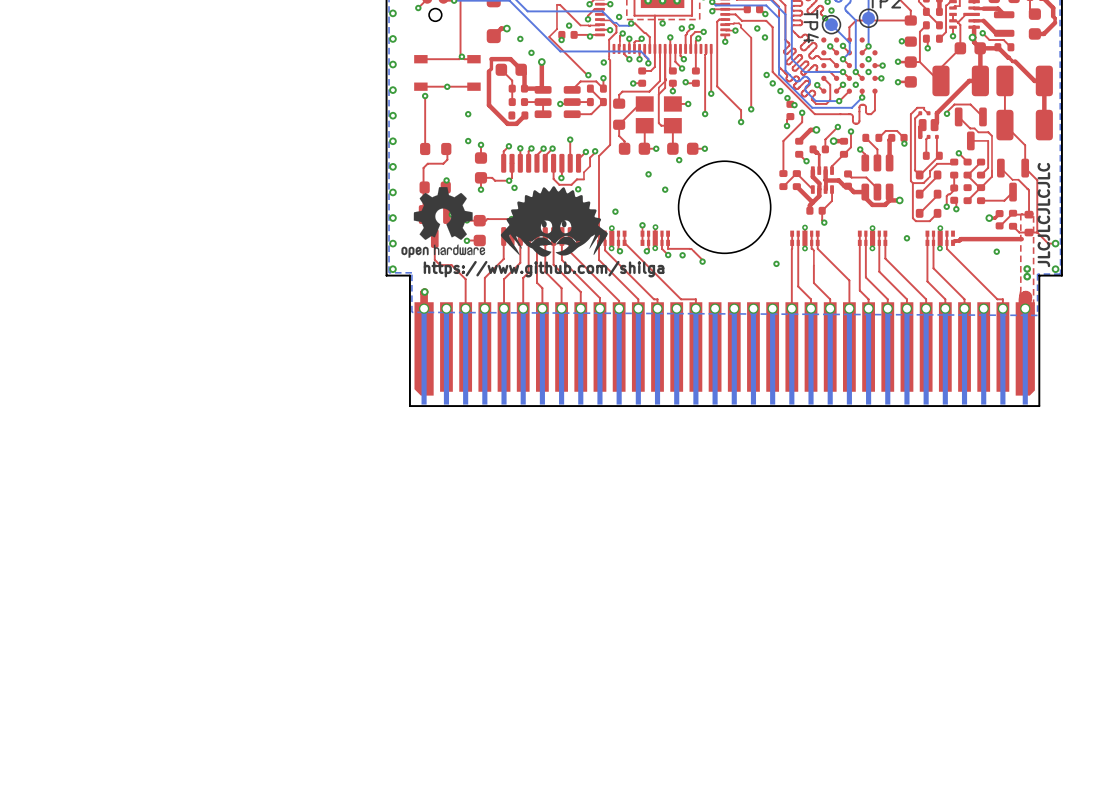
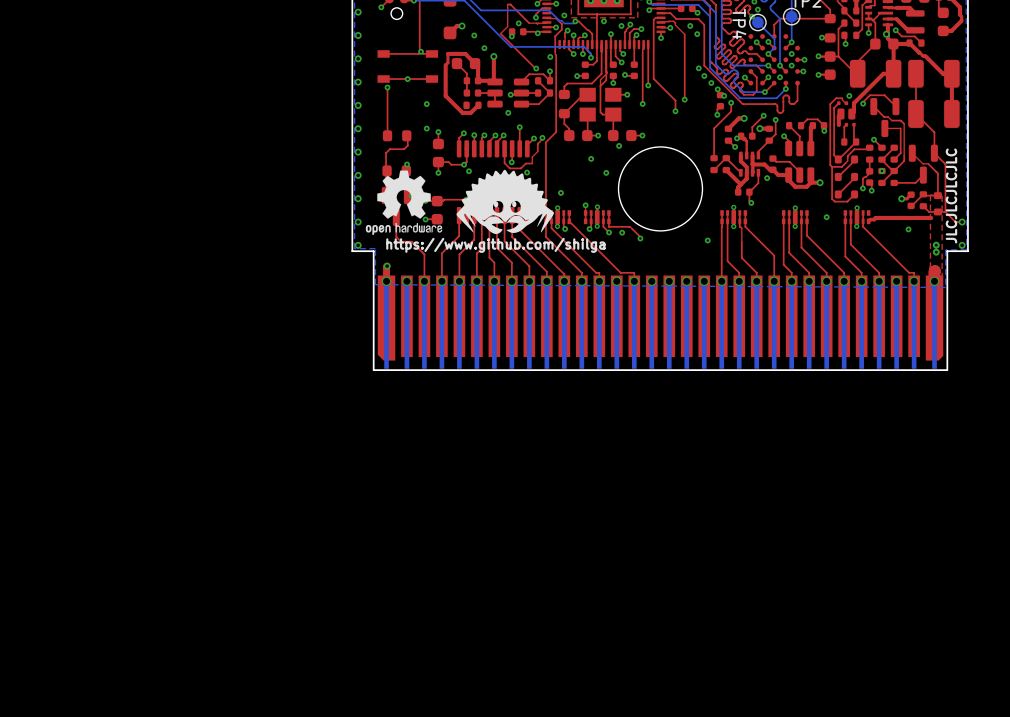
via: none -> (849, 95)
via: none -> (508, 112)
via: none -> (737, 138)
via: none -> (881, 171)
via: none -> (767, 178)

